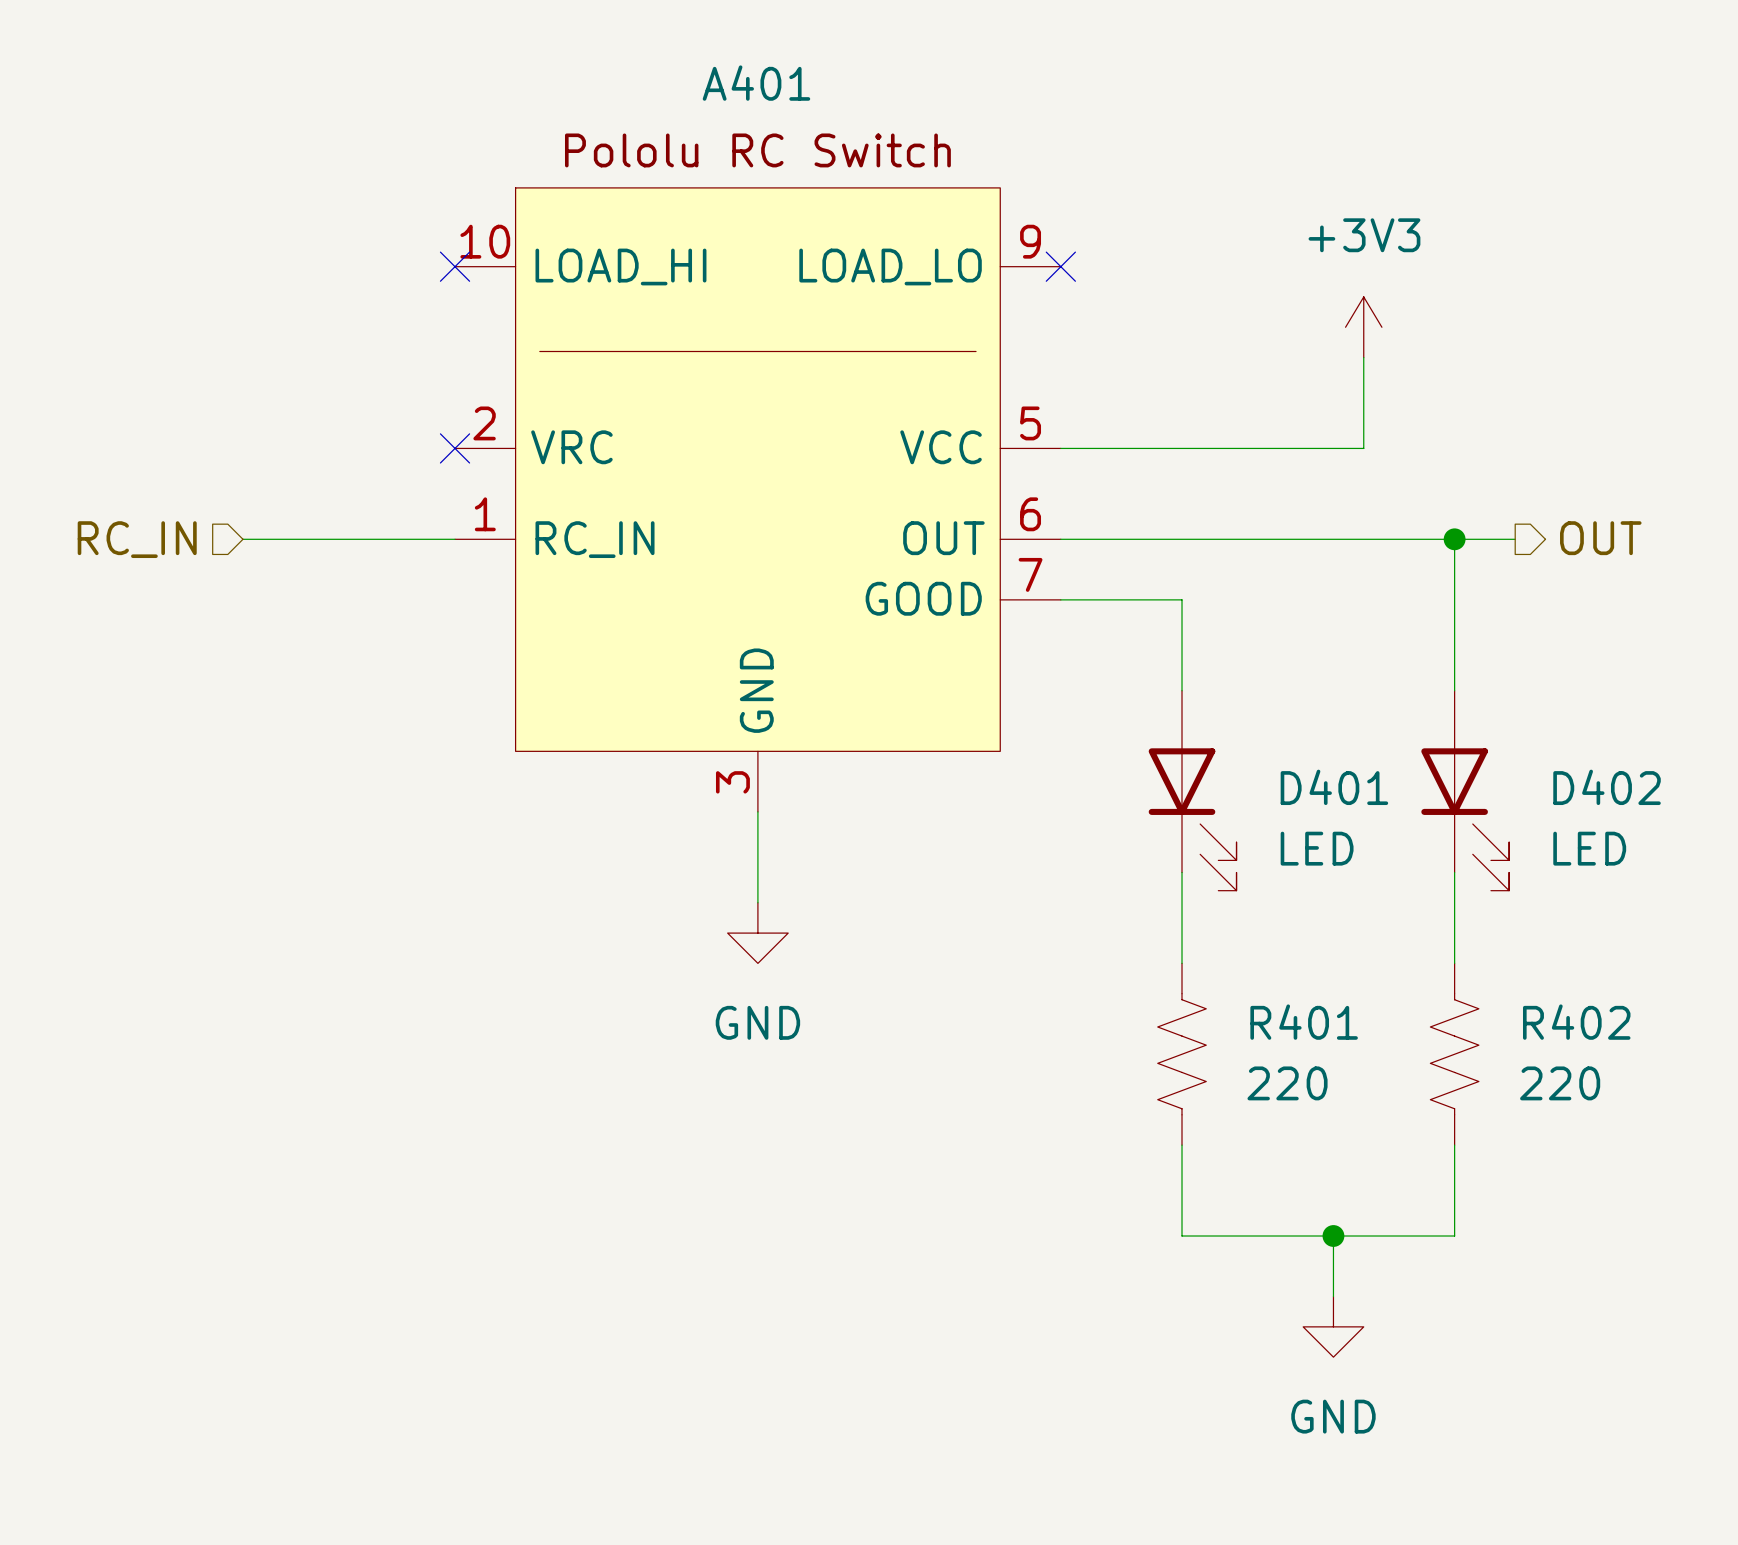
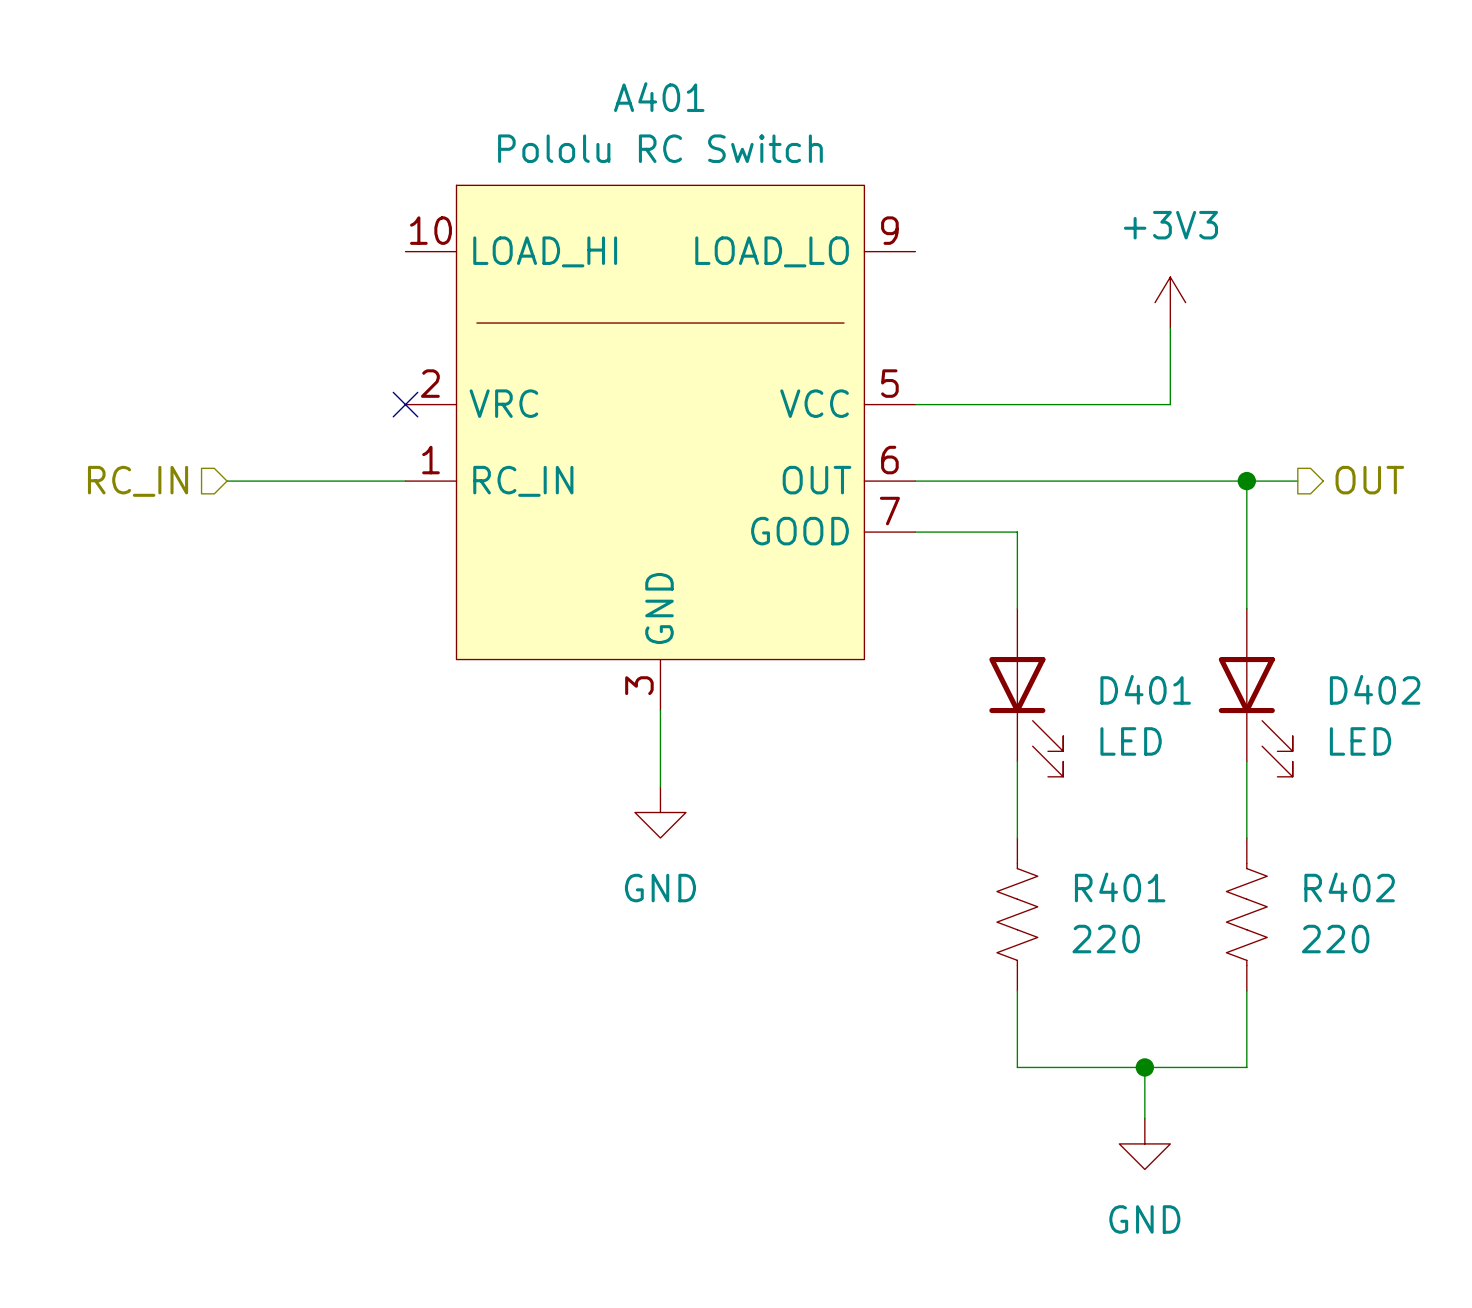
A401 value: none -> Pololu RC Switch (660, 148)
A401 text: Pololu RC Switch (757, 150) -> none
no-connect mark: (455, 266) -> none
no-connect mark: (1060, 266) -> none

